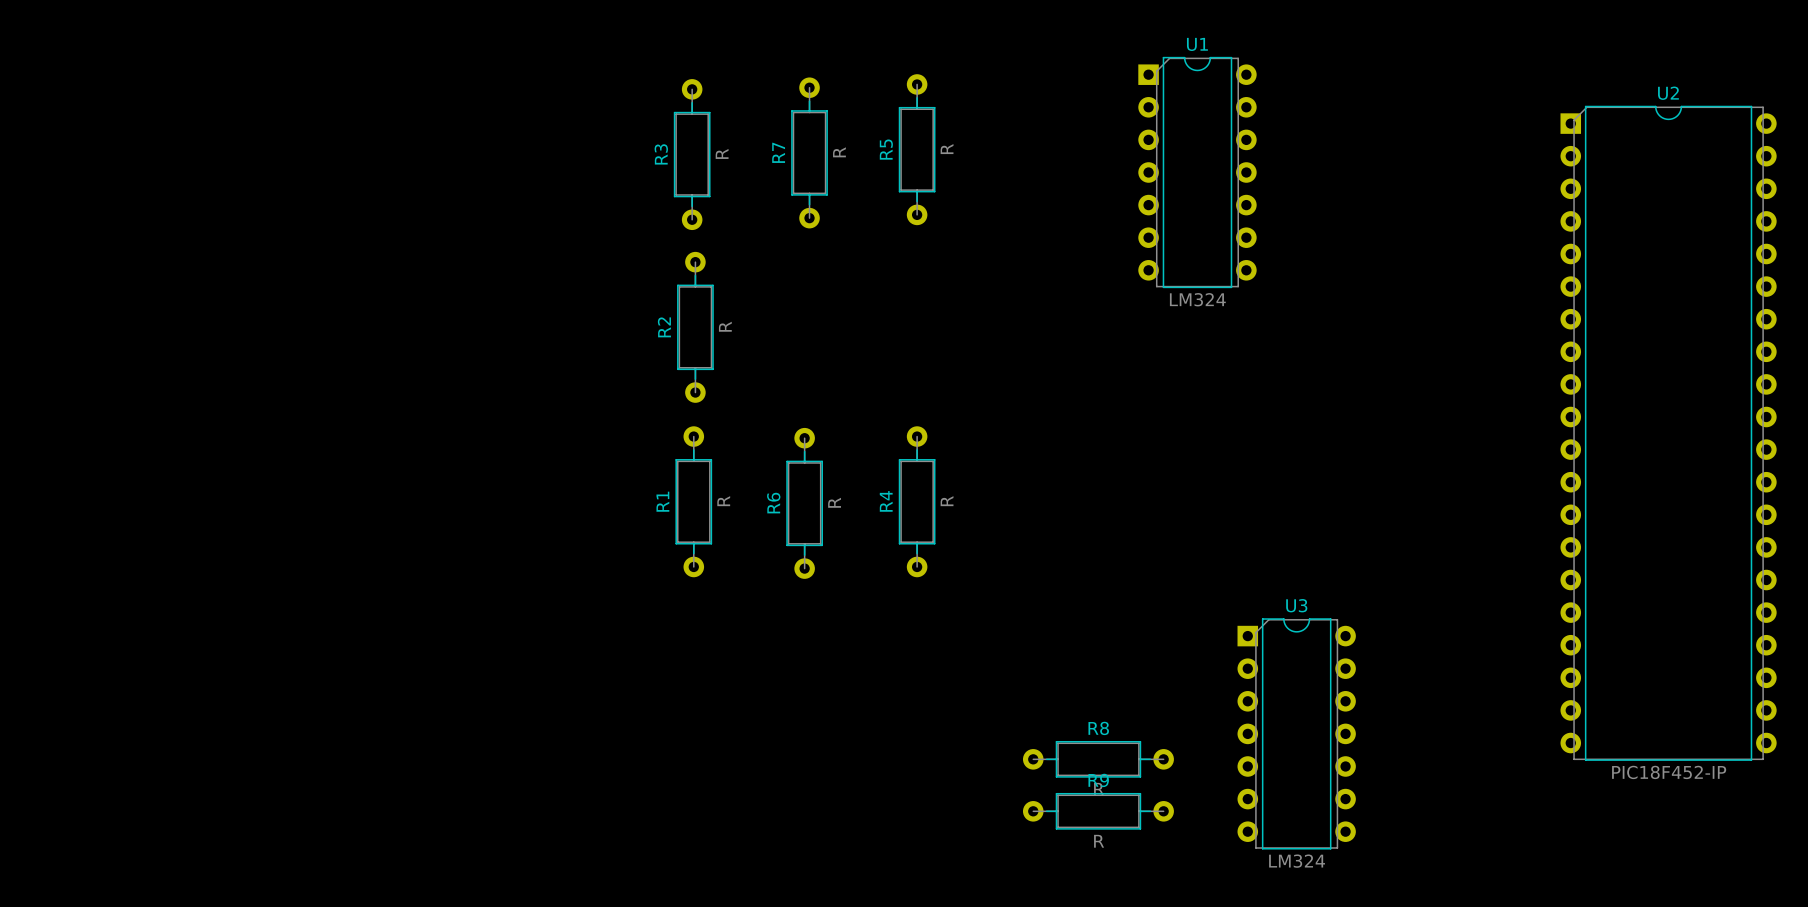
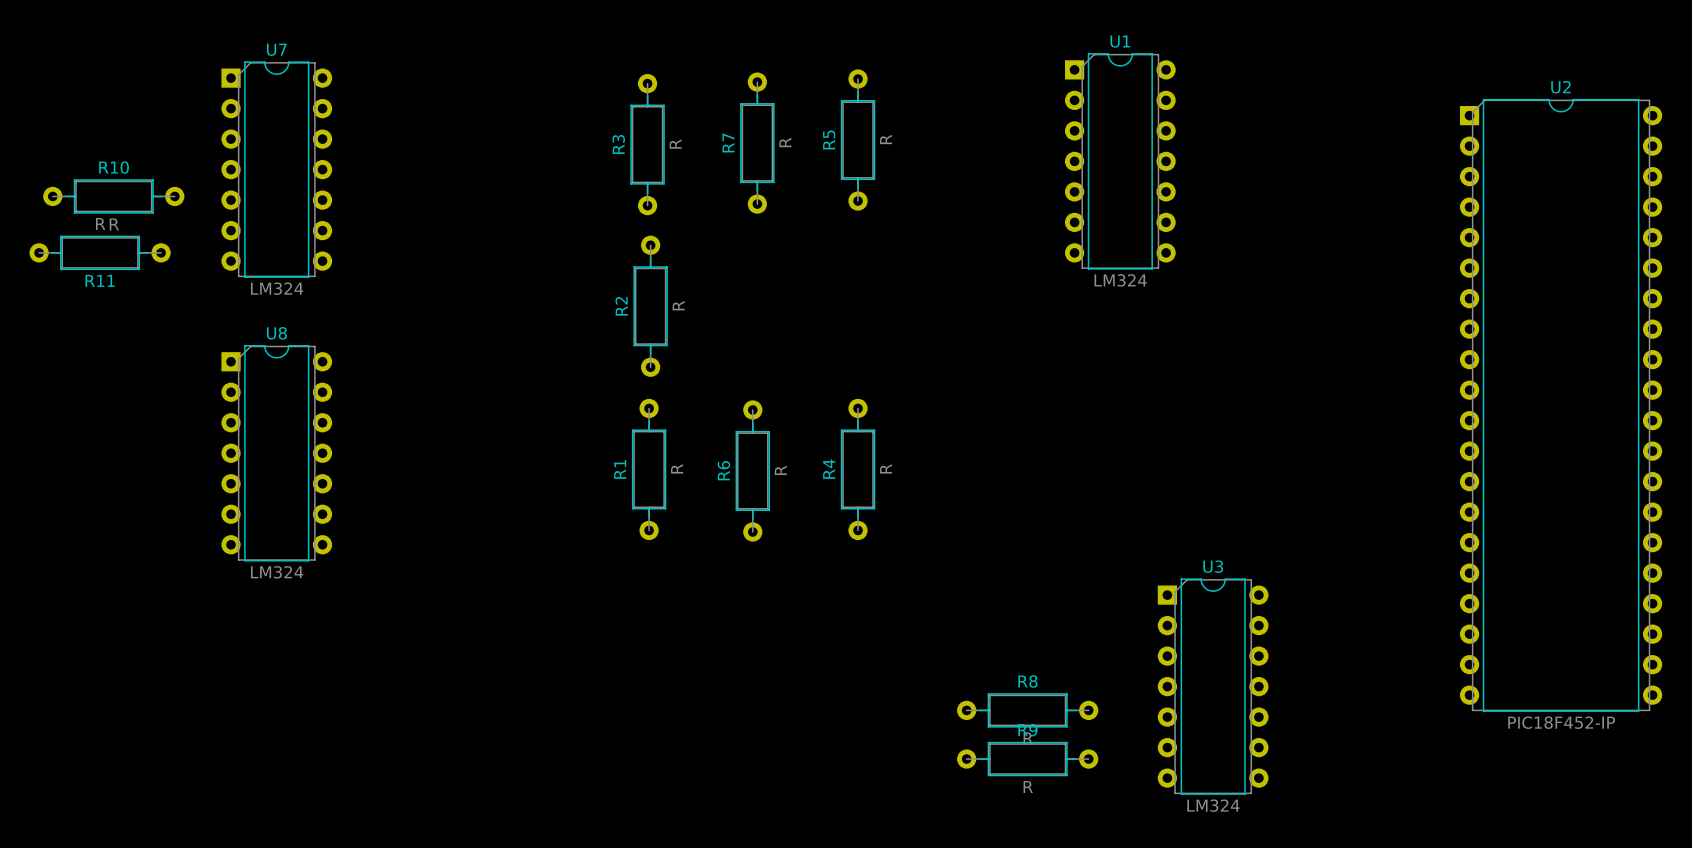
U7: none -> LM324 (276, 169)
R10: none -> R (113, 196)
R11: none -> R (100, 252)
U8: none -> LM324 (276, 453)

